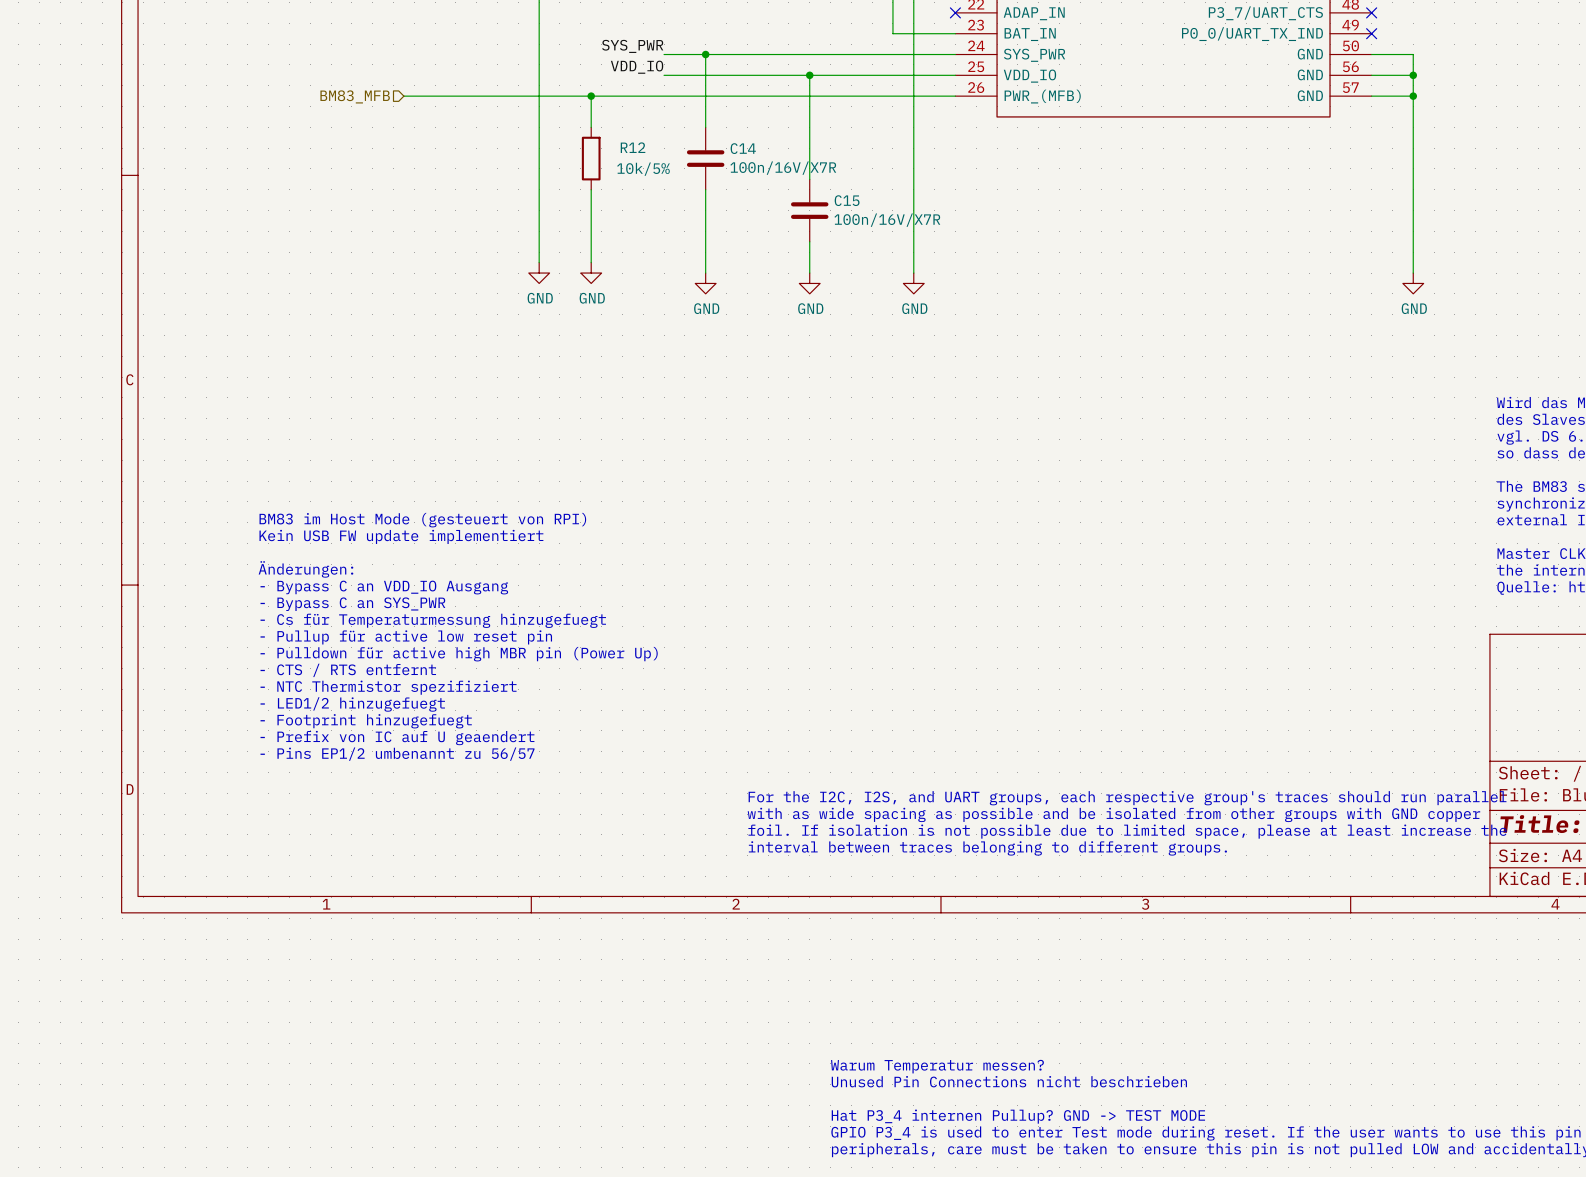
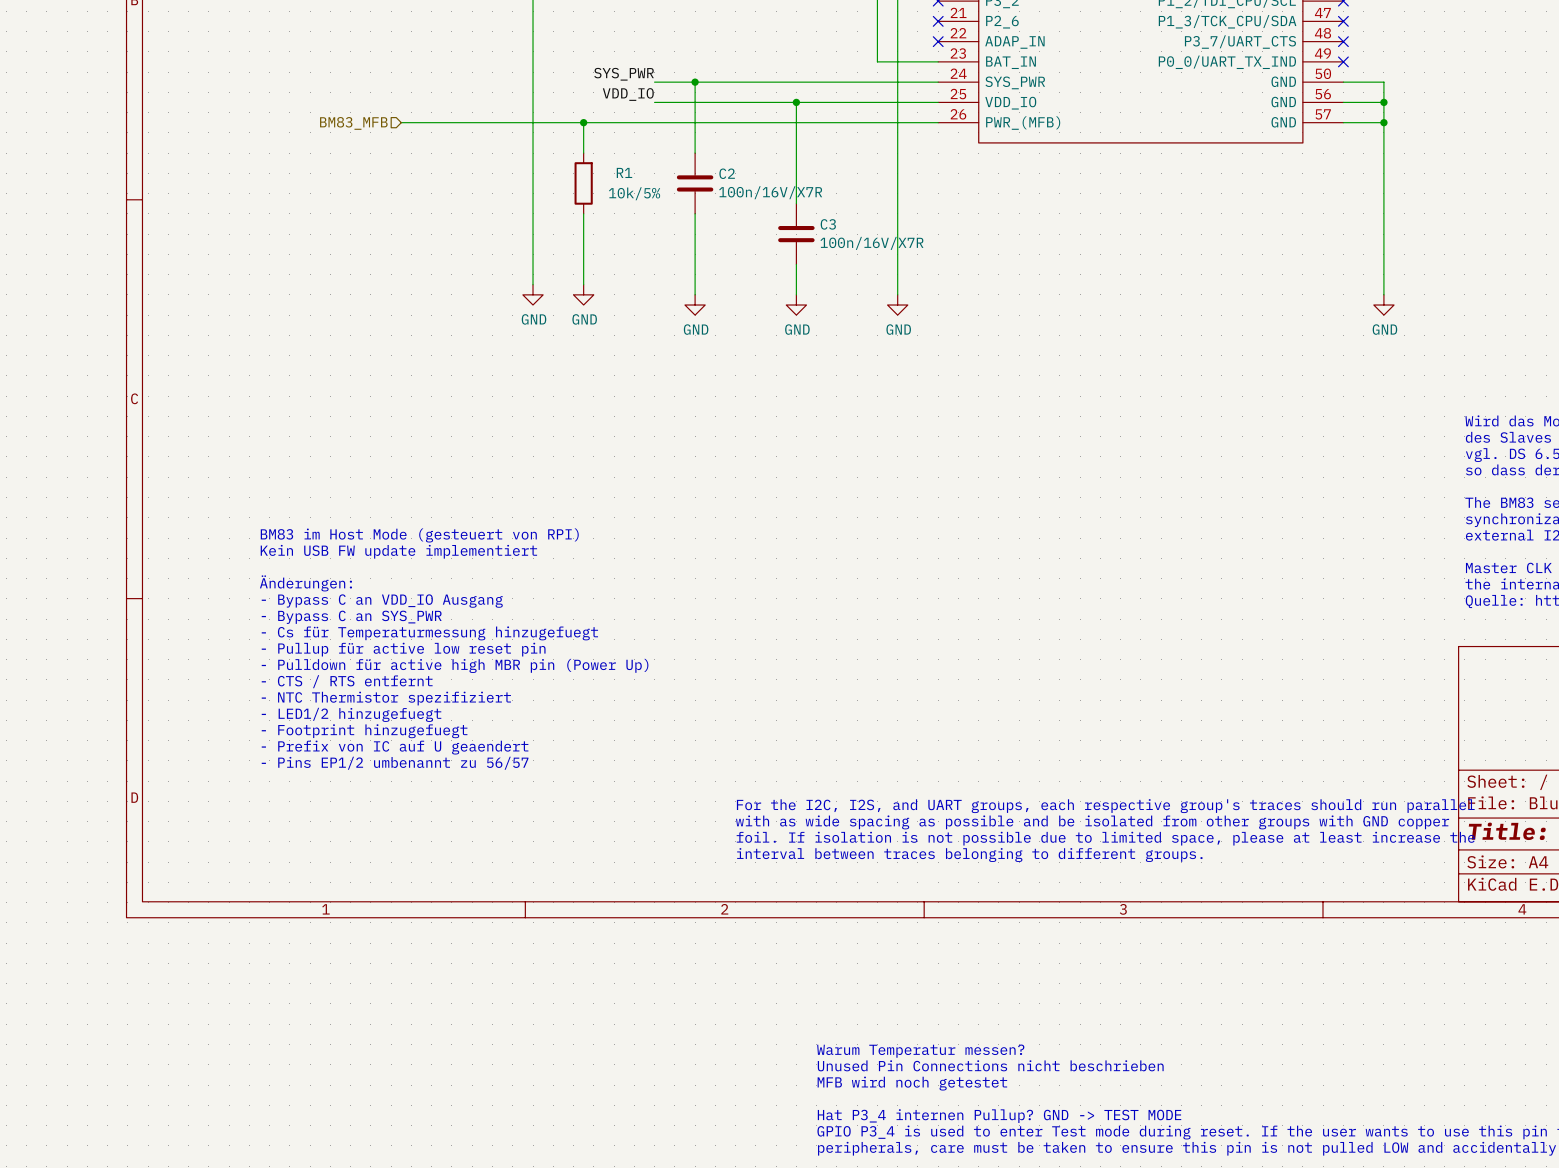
R12 name: R12 (633, 147) -> R1 (624, 172)
C14 name: C14 (743, 148) -> C2 (727, 173)
C15 name: C15 (847, 200) -> C3 (828, 224)
text: none -> Warum Temperatur messen? (920, 1051)
text: Warum Temperatur messen? (937, 1066) -> Unused Pin Connections nicht beschrieben (990, 1065)
text: Unused Pin Connections nicht beschrieben (1009, 1081) -> MFB wird noch getestet (912, 1083)

